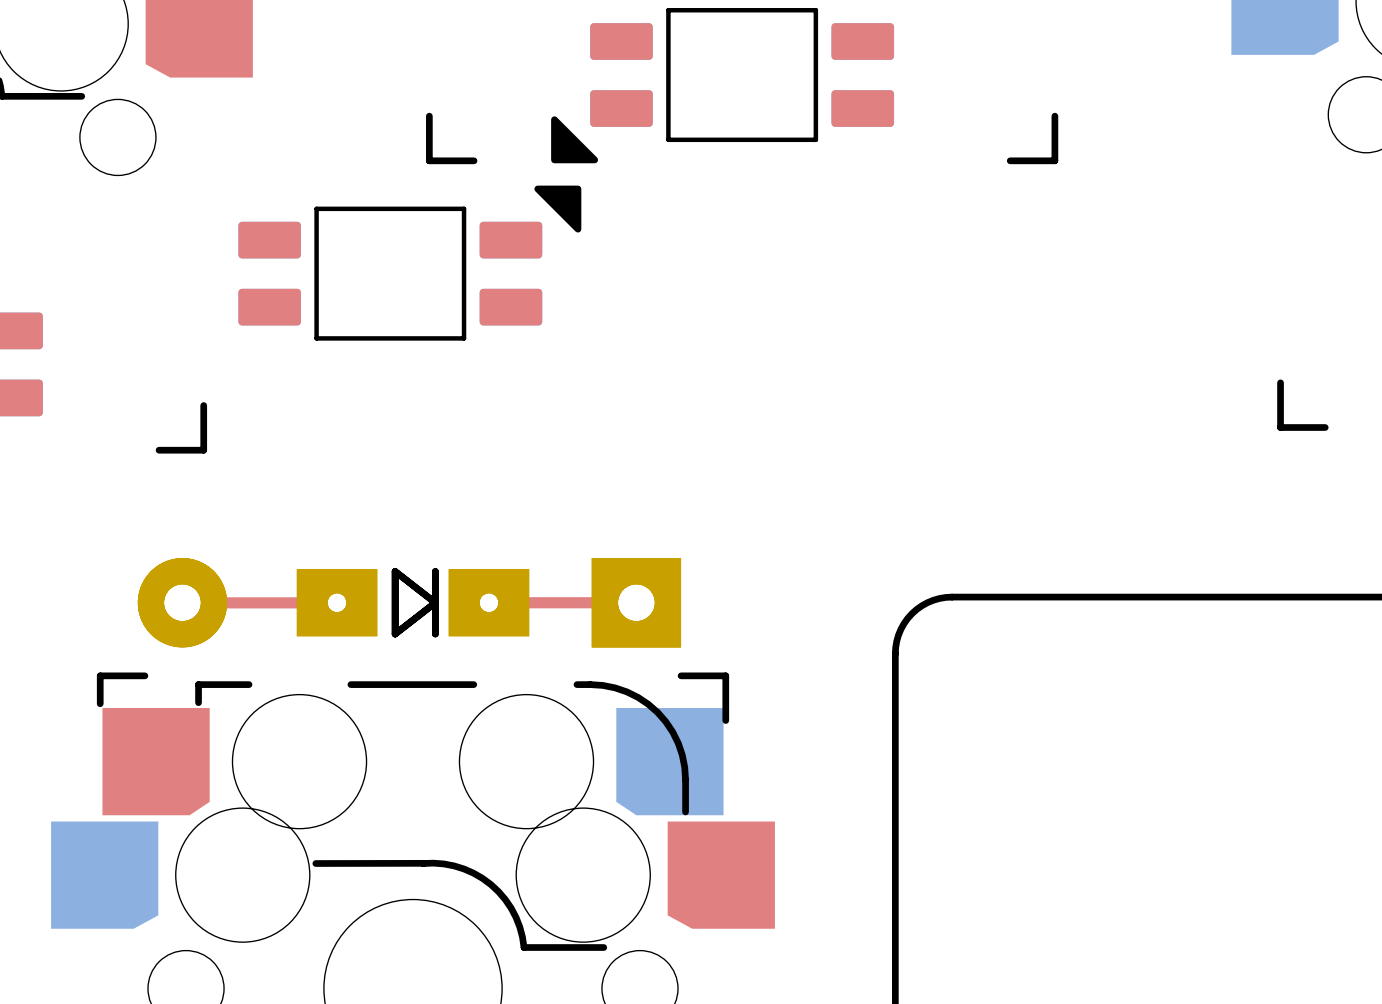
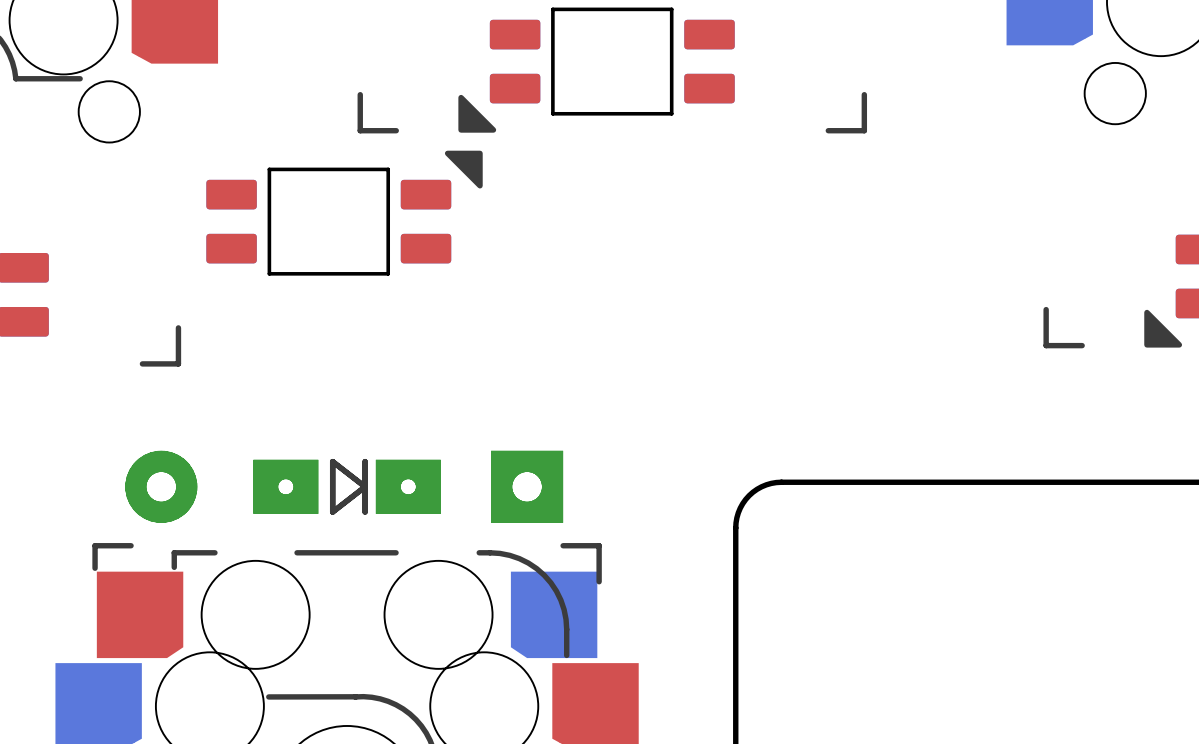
top track: (182, 602) (336, 602) -> none
top track: (488, 602) (636, 602) -> none

